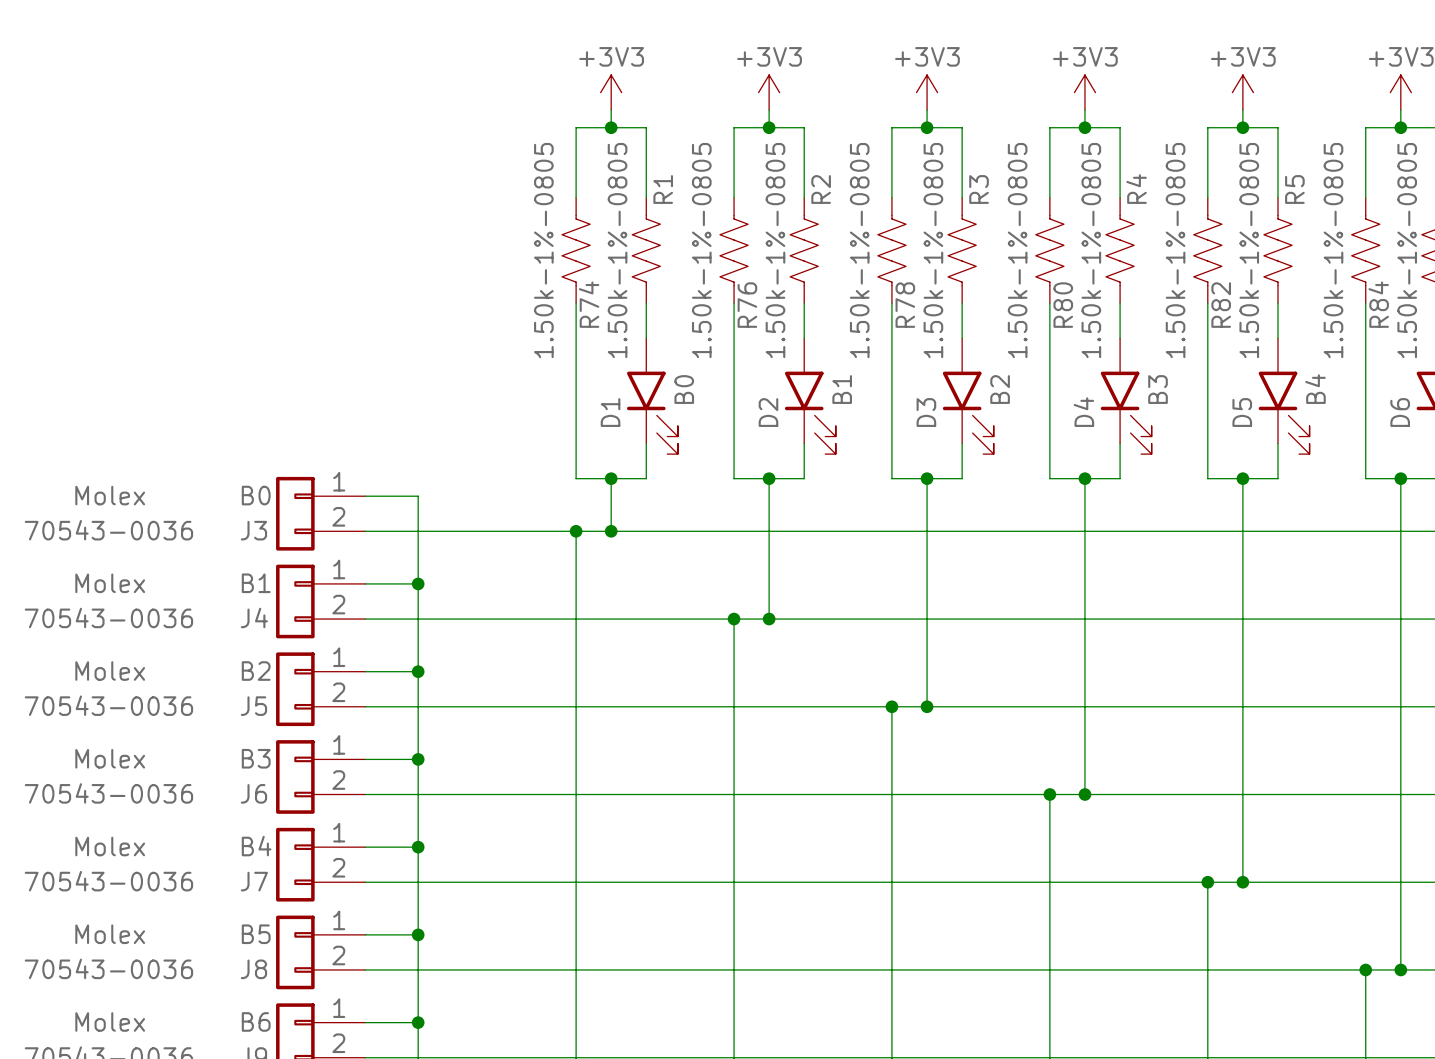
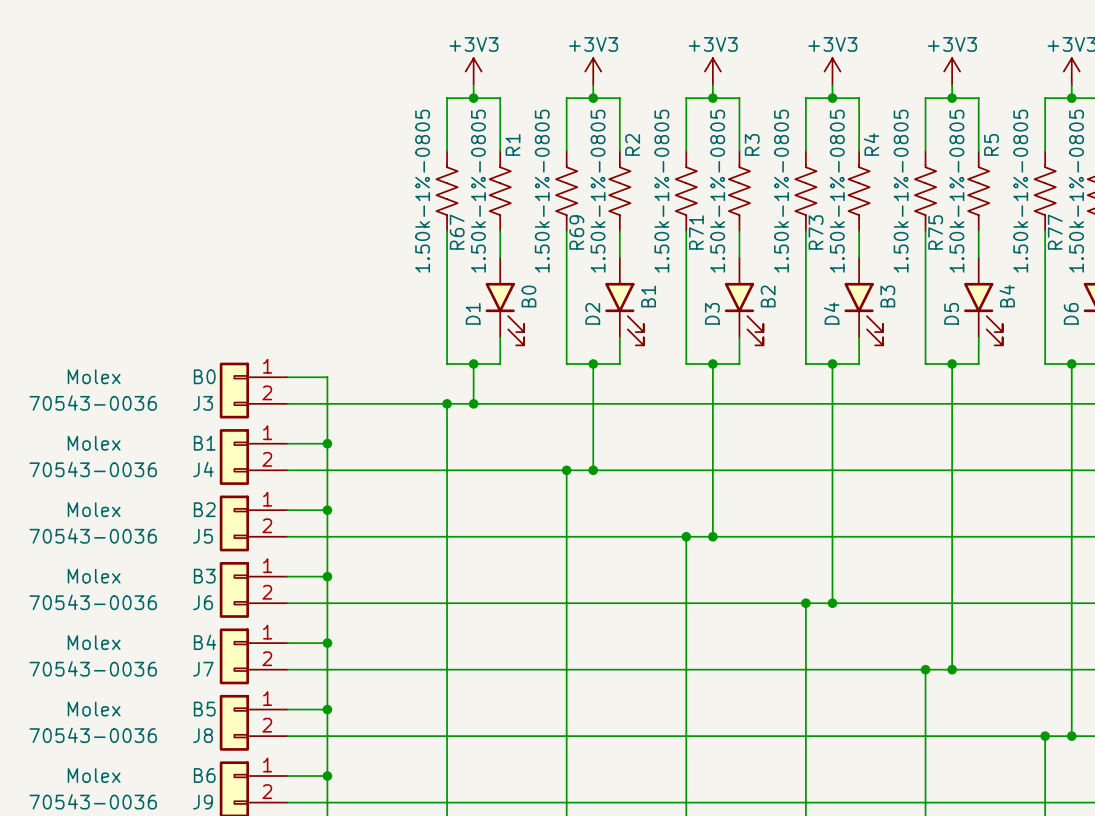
R74 name: R74 (589, 304) -> R67 (457, 232)
R84 name: R84 (1378, 304) -> R77 (1055, 232)
R76 name: R76 (747, 305) -> R69 (576, 232)
R78 name: R78 (905, 305) -> R71 (696, 232)
R80 name: R80 (1063, 305) -> R73 (816, 232)
R82 name: R82 (1221, 305) -> R75 (935, 232)

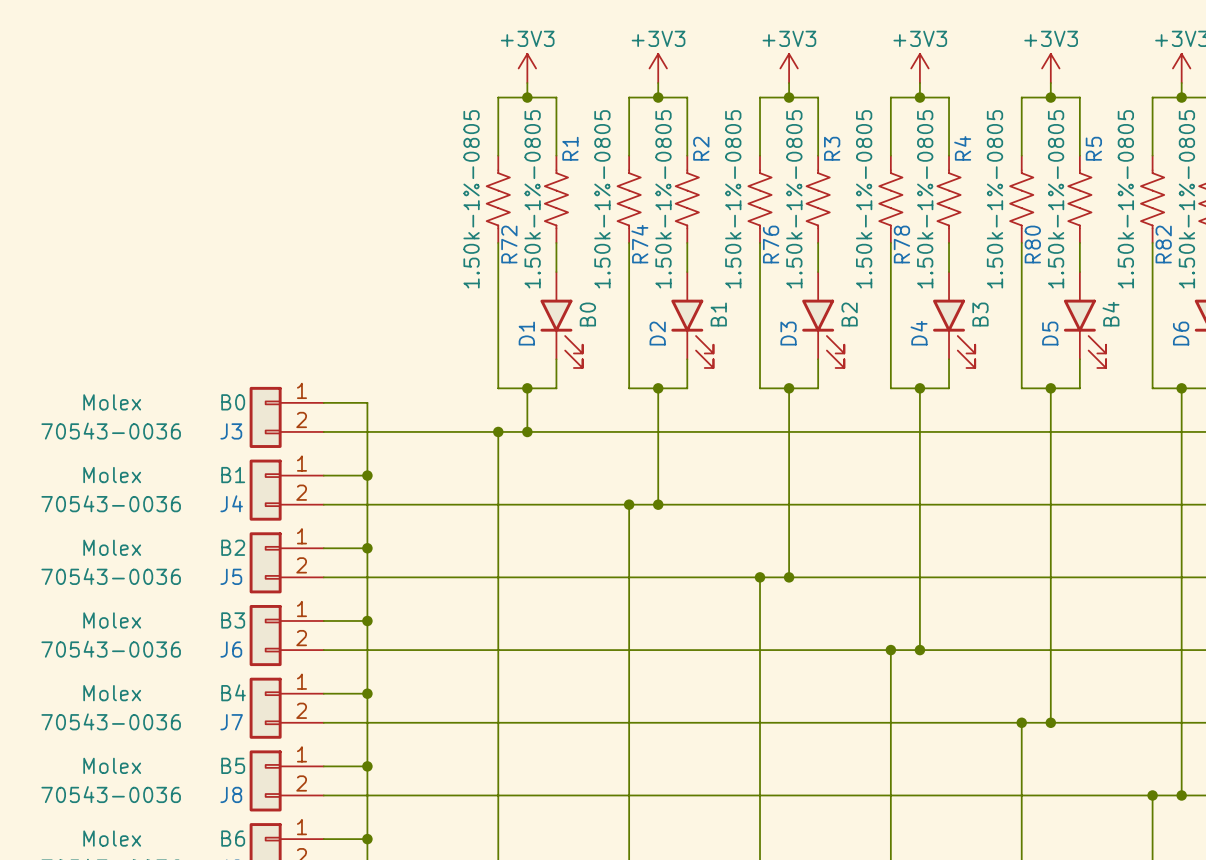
R67 name: R67 (457, 232) -> R72 (509, 244)
R69 name: R69 (576, 232) -> R74 (639, 244)
R71 name: R71 (696, 232) -> R76 (771, 244)
R73 name: R73 (816, 232) -> R78 (901, 244)
R75 name: R75 (935, 232) -> R80 (1032, 244)
R77 name: R77 (1055, 232) -> R82 (1163, 244)

